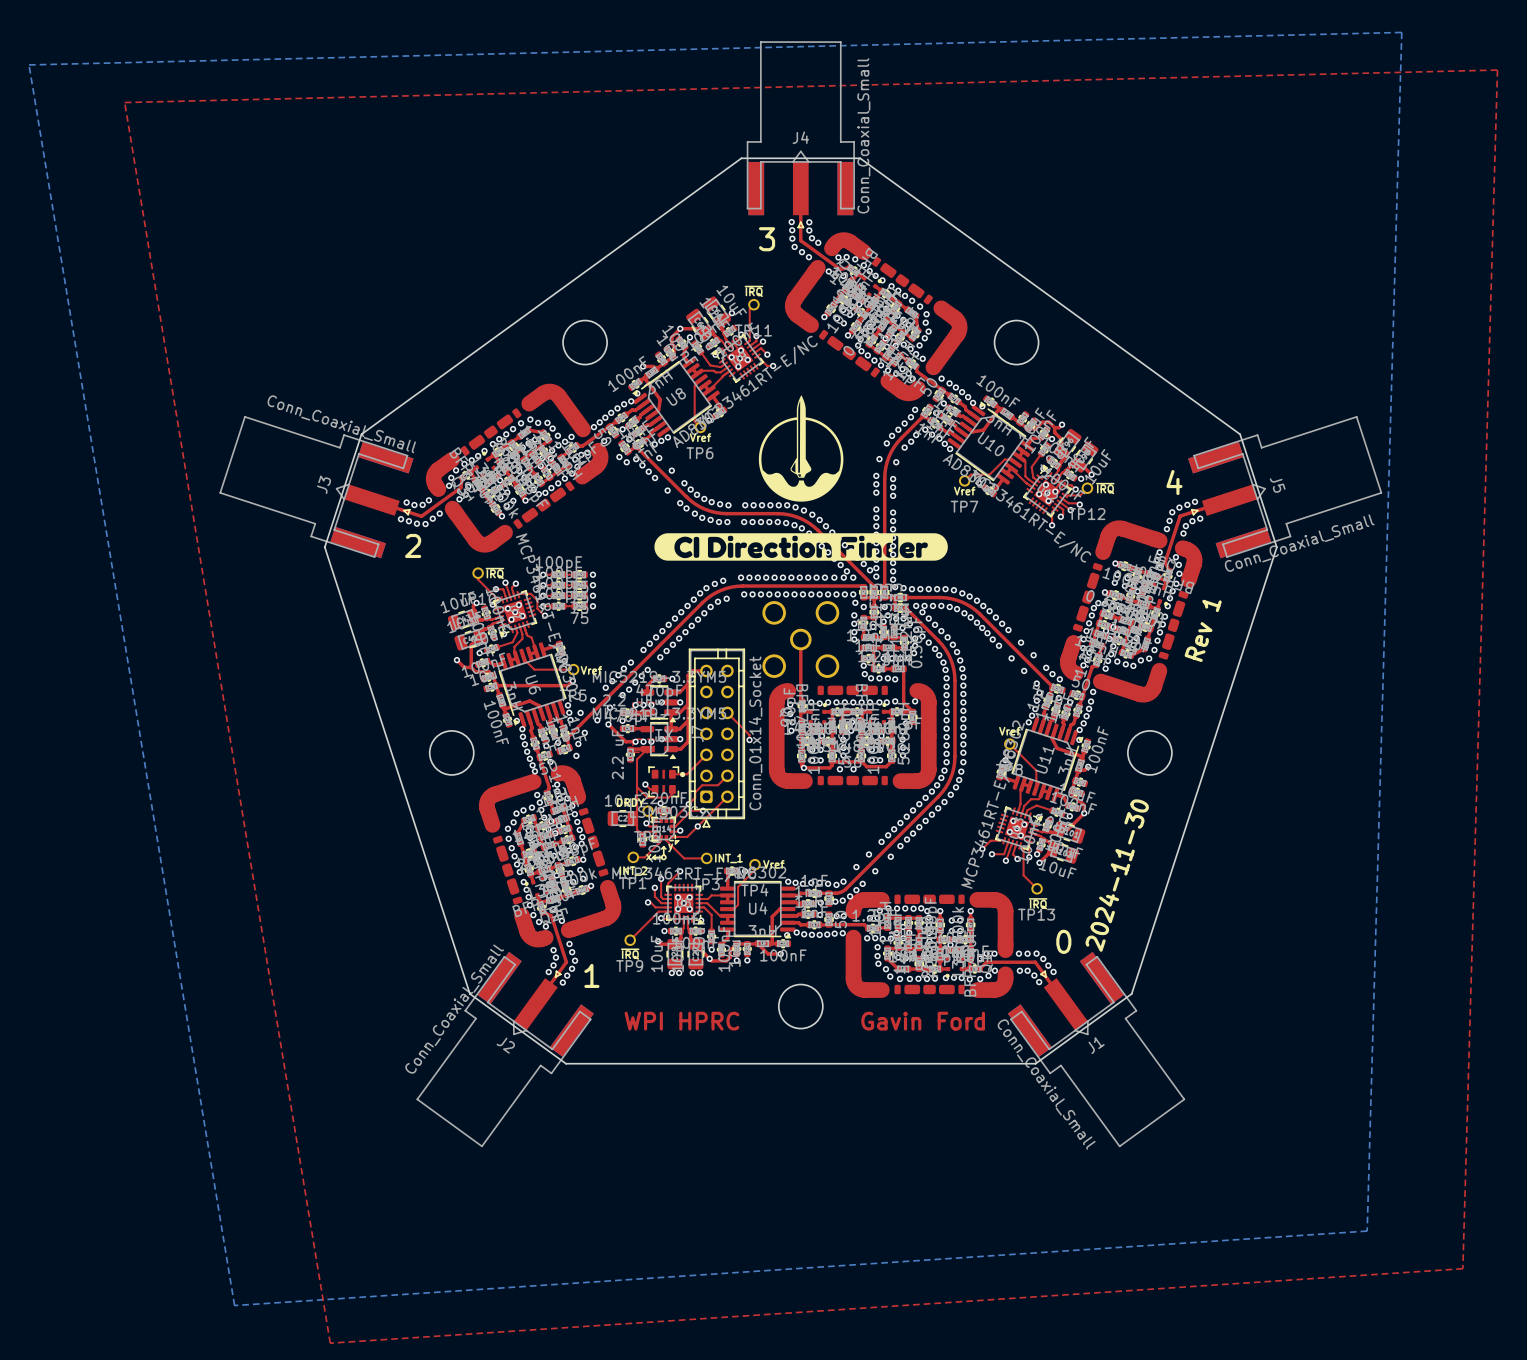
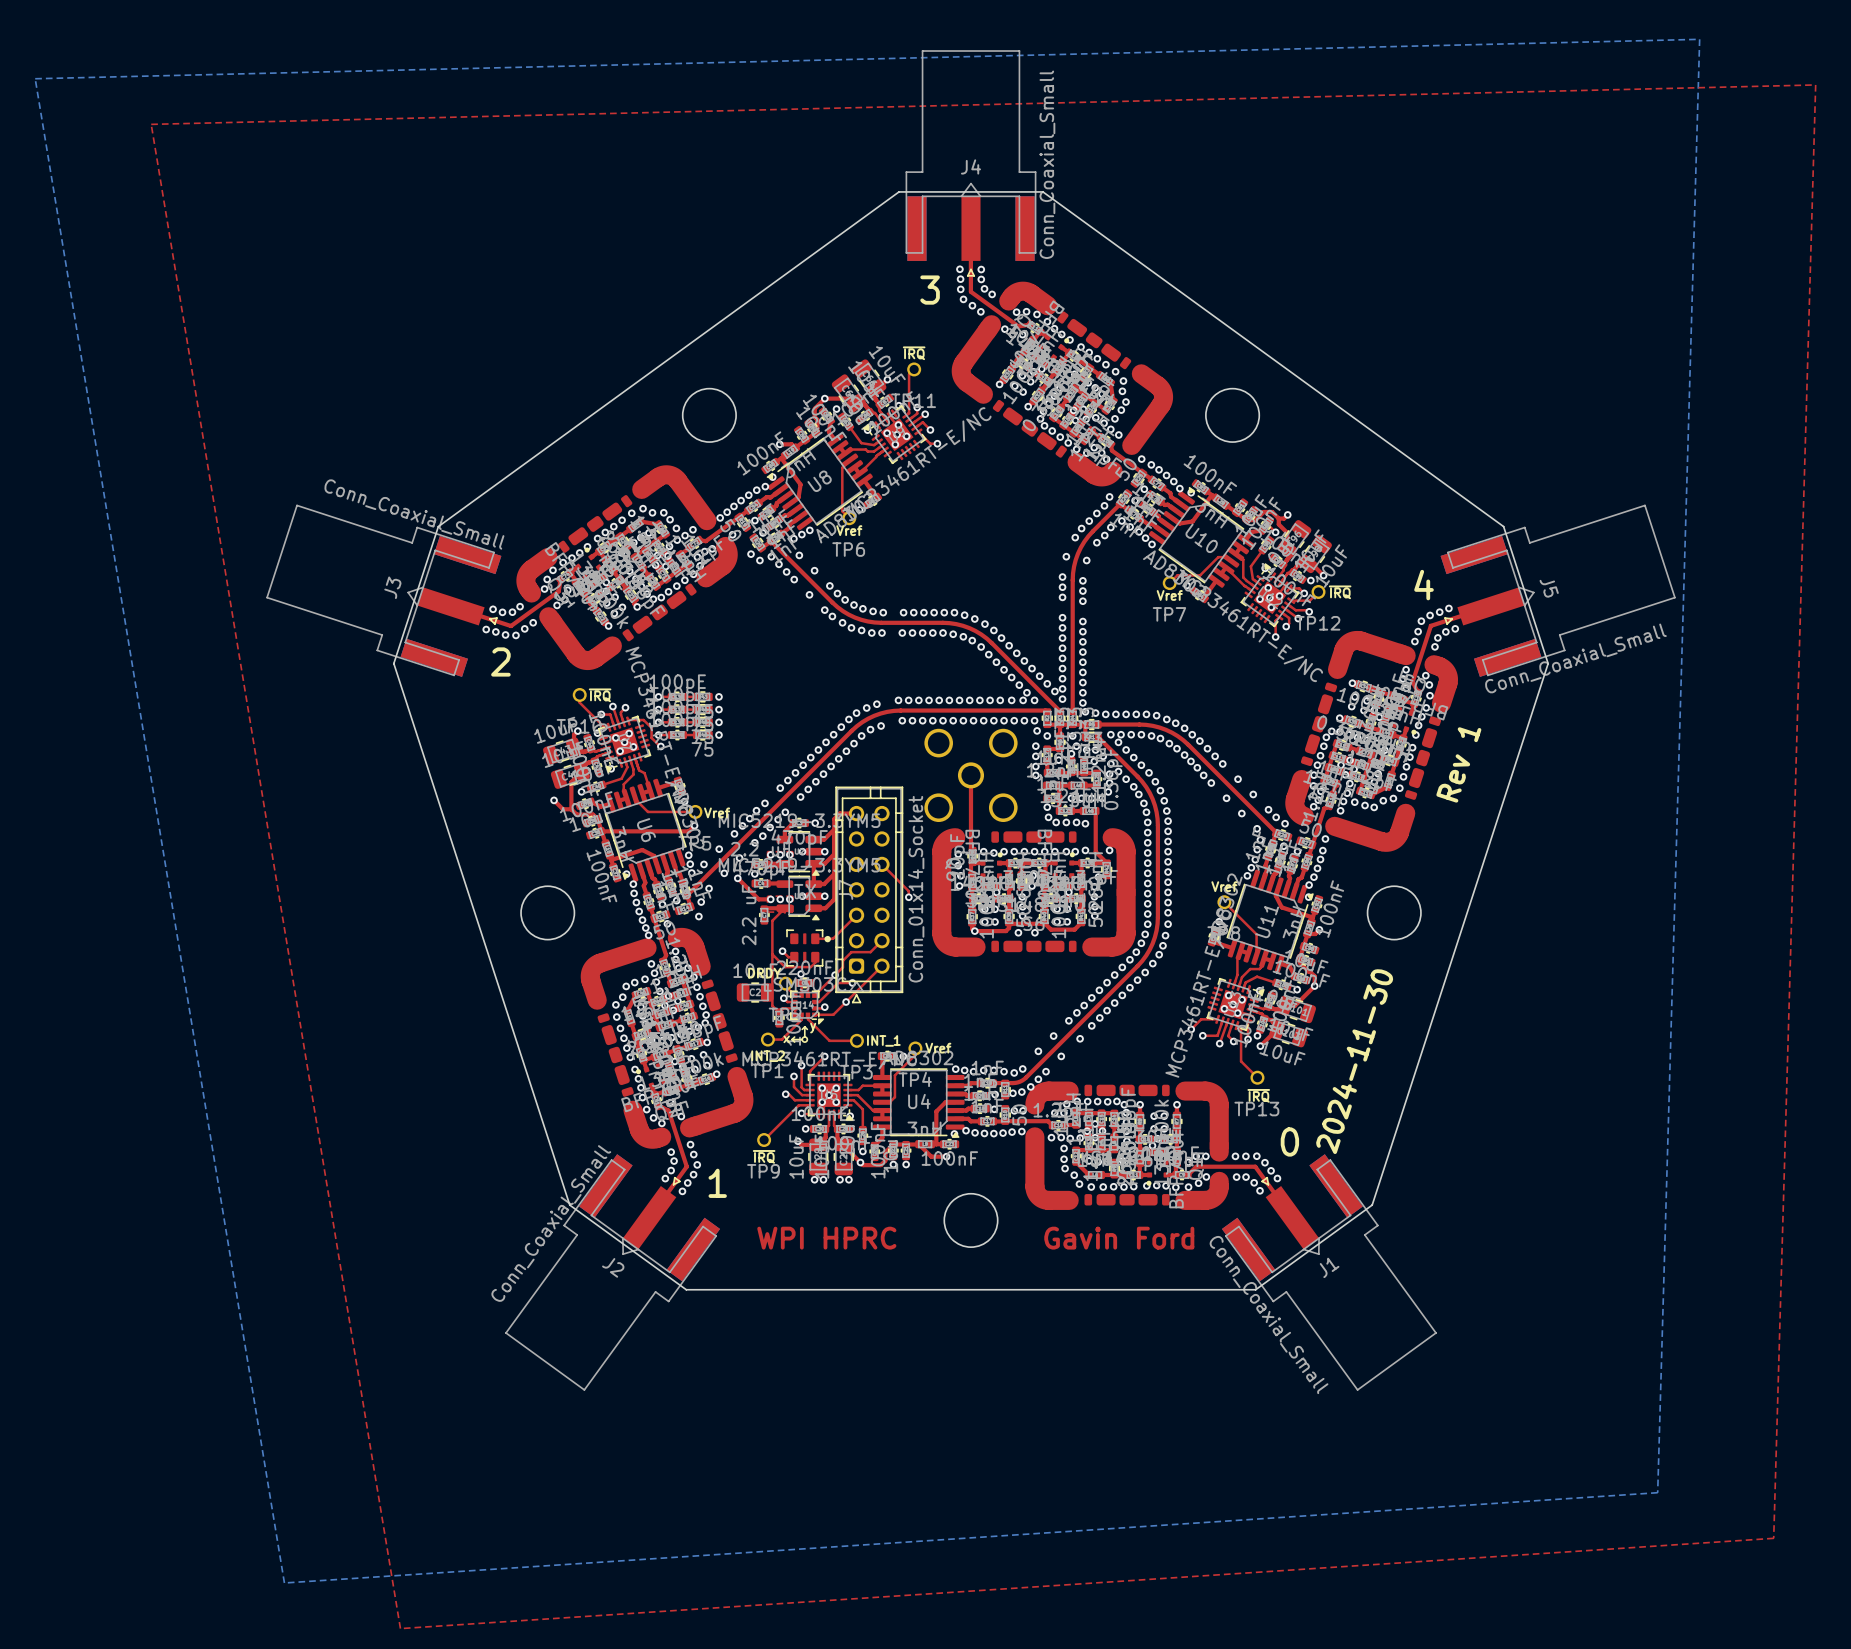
drawing: [758, 395, 844, 502] -> none
drawing: [654, 533, 948, 561] -> none

